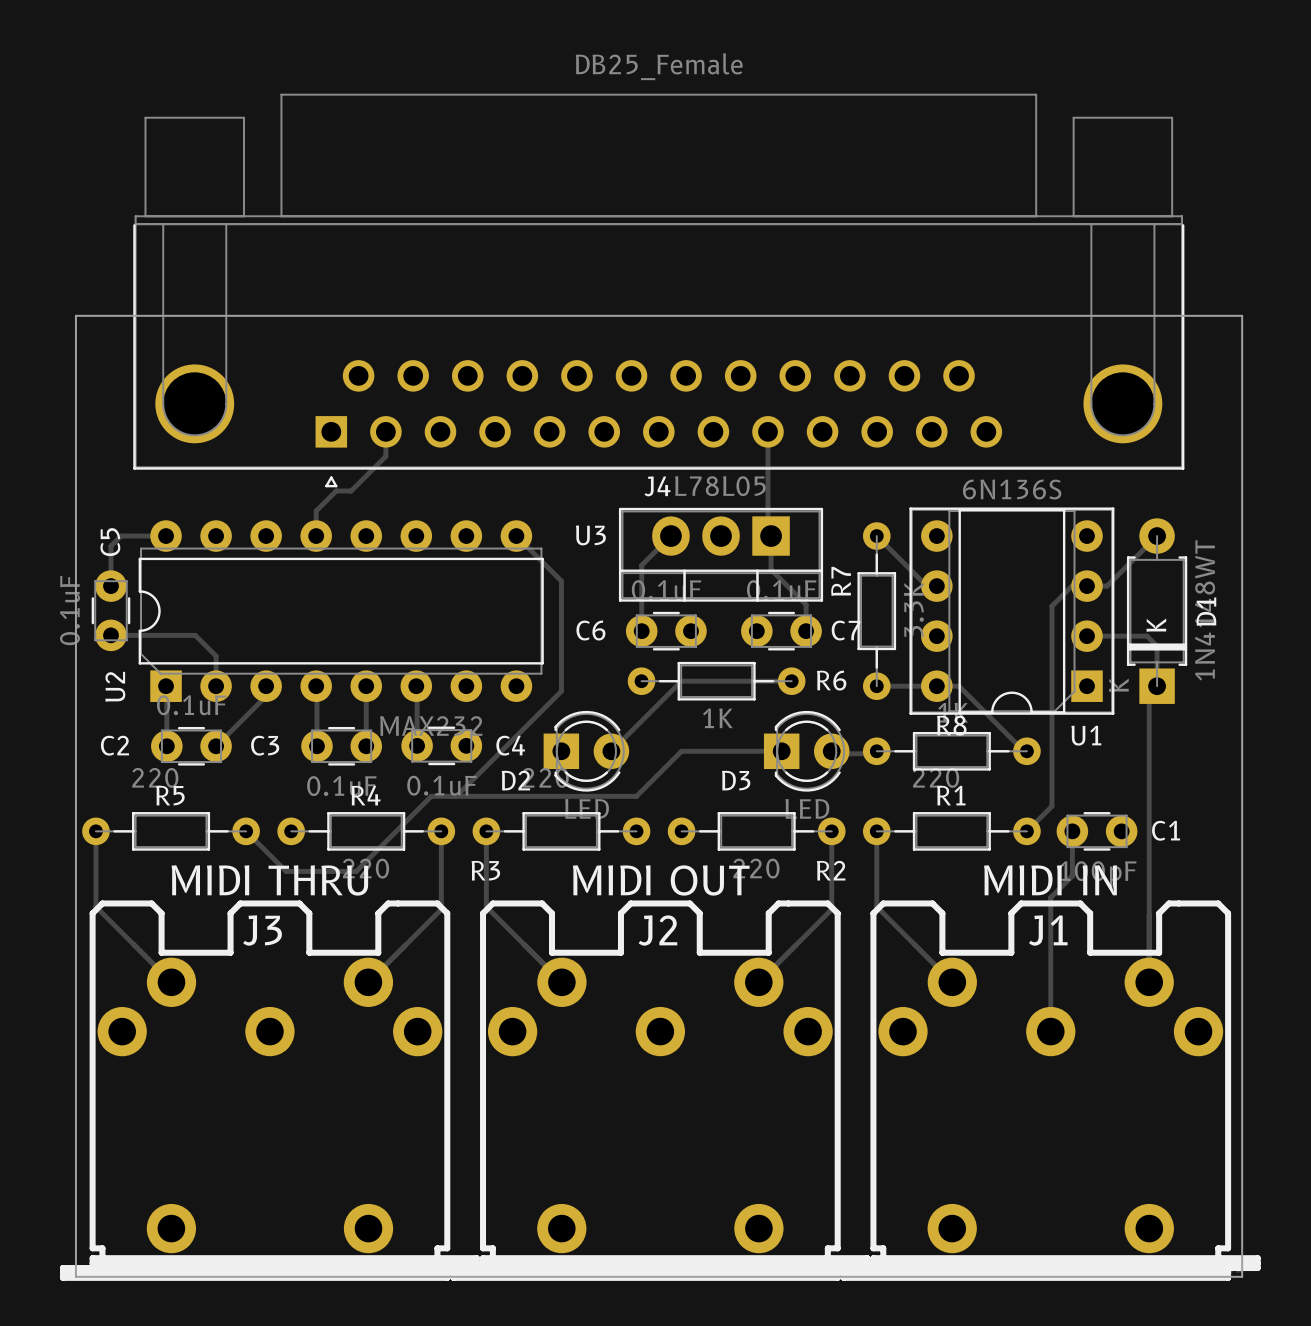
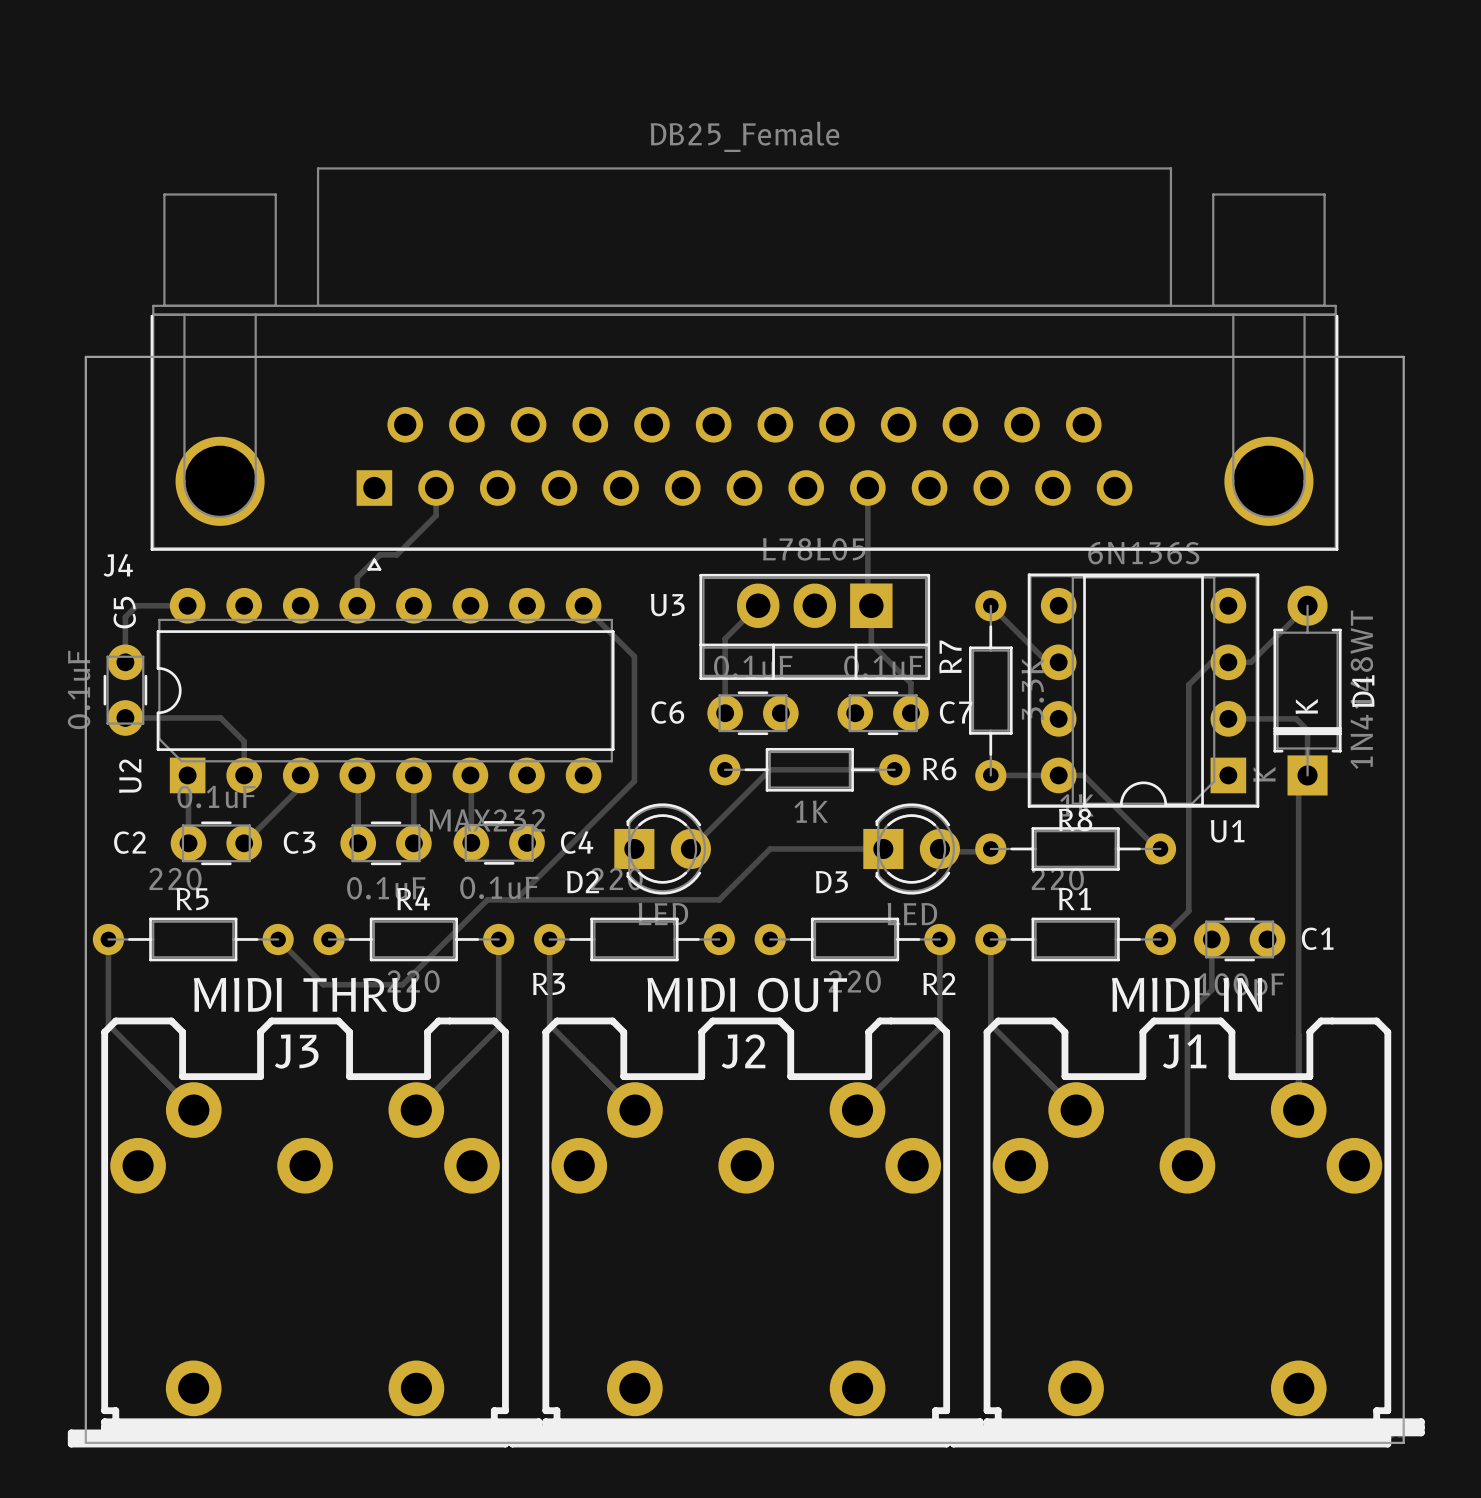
J4 footprint: [133, 93, 1185, 488] -> [150, 167, 1339, 571]
J4 name position: J4 (657, 486) -> J4 (118, 565)

